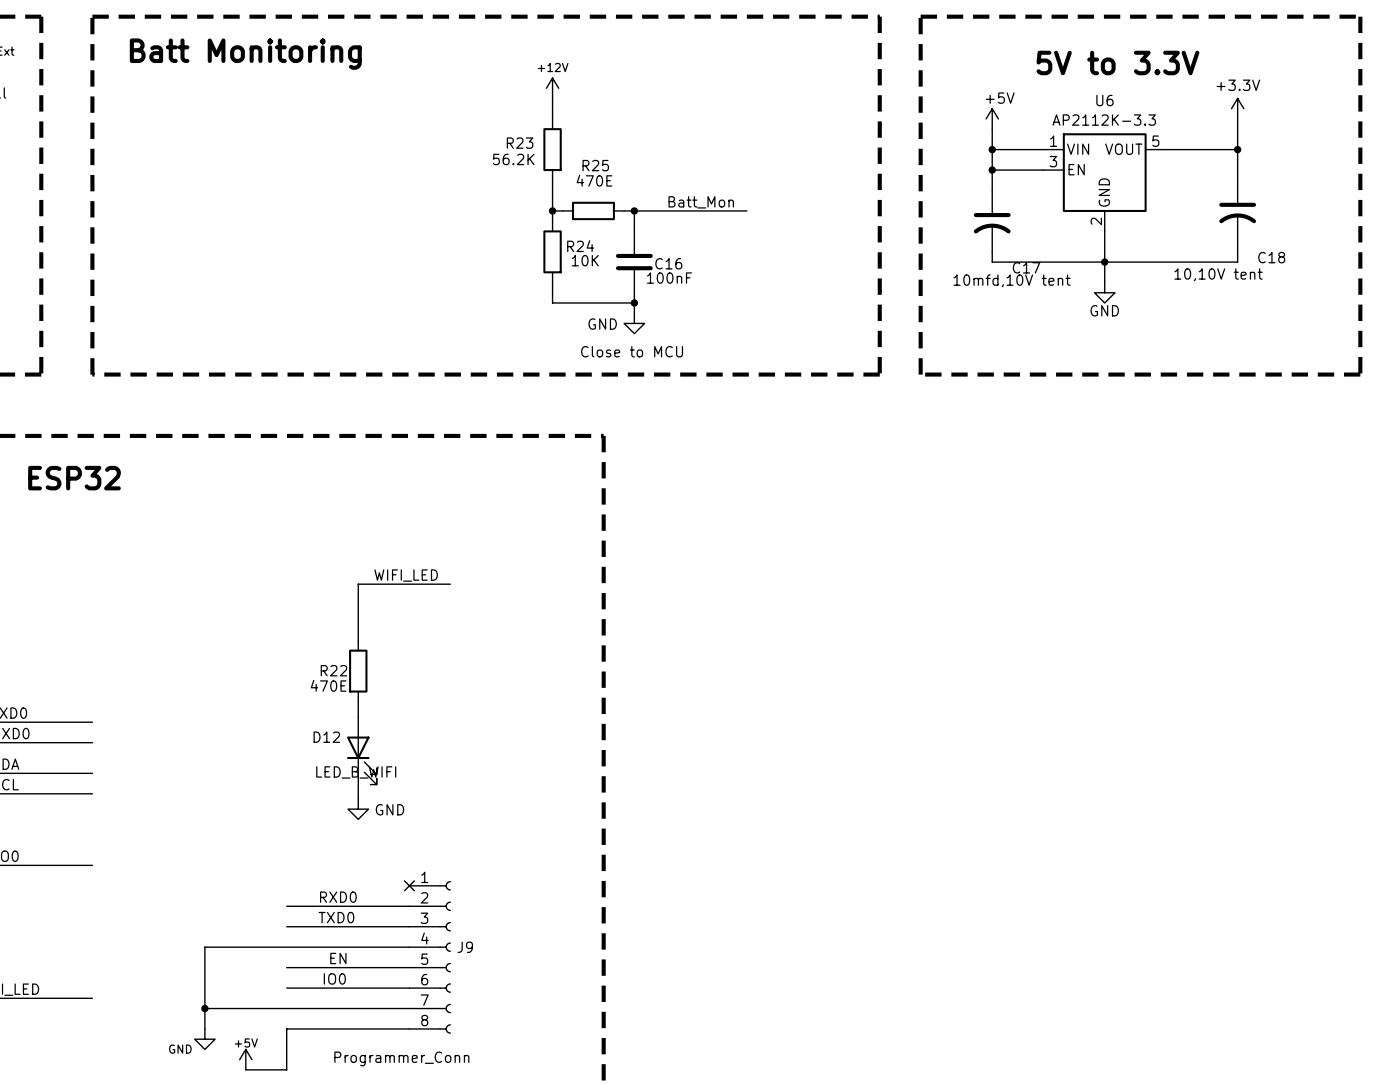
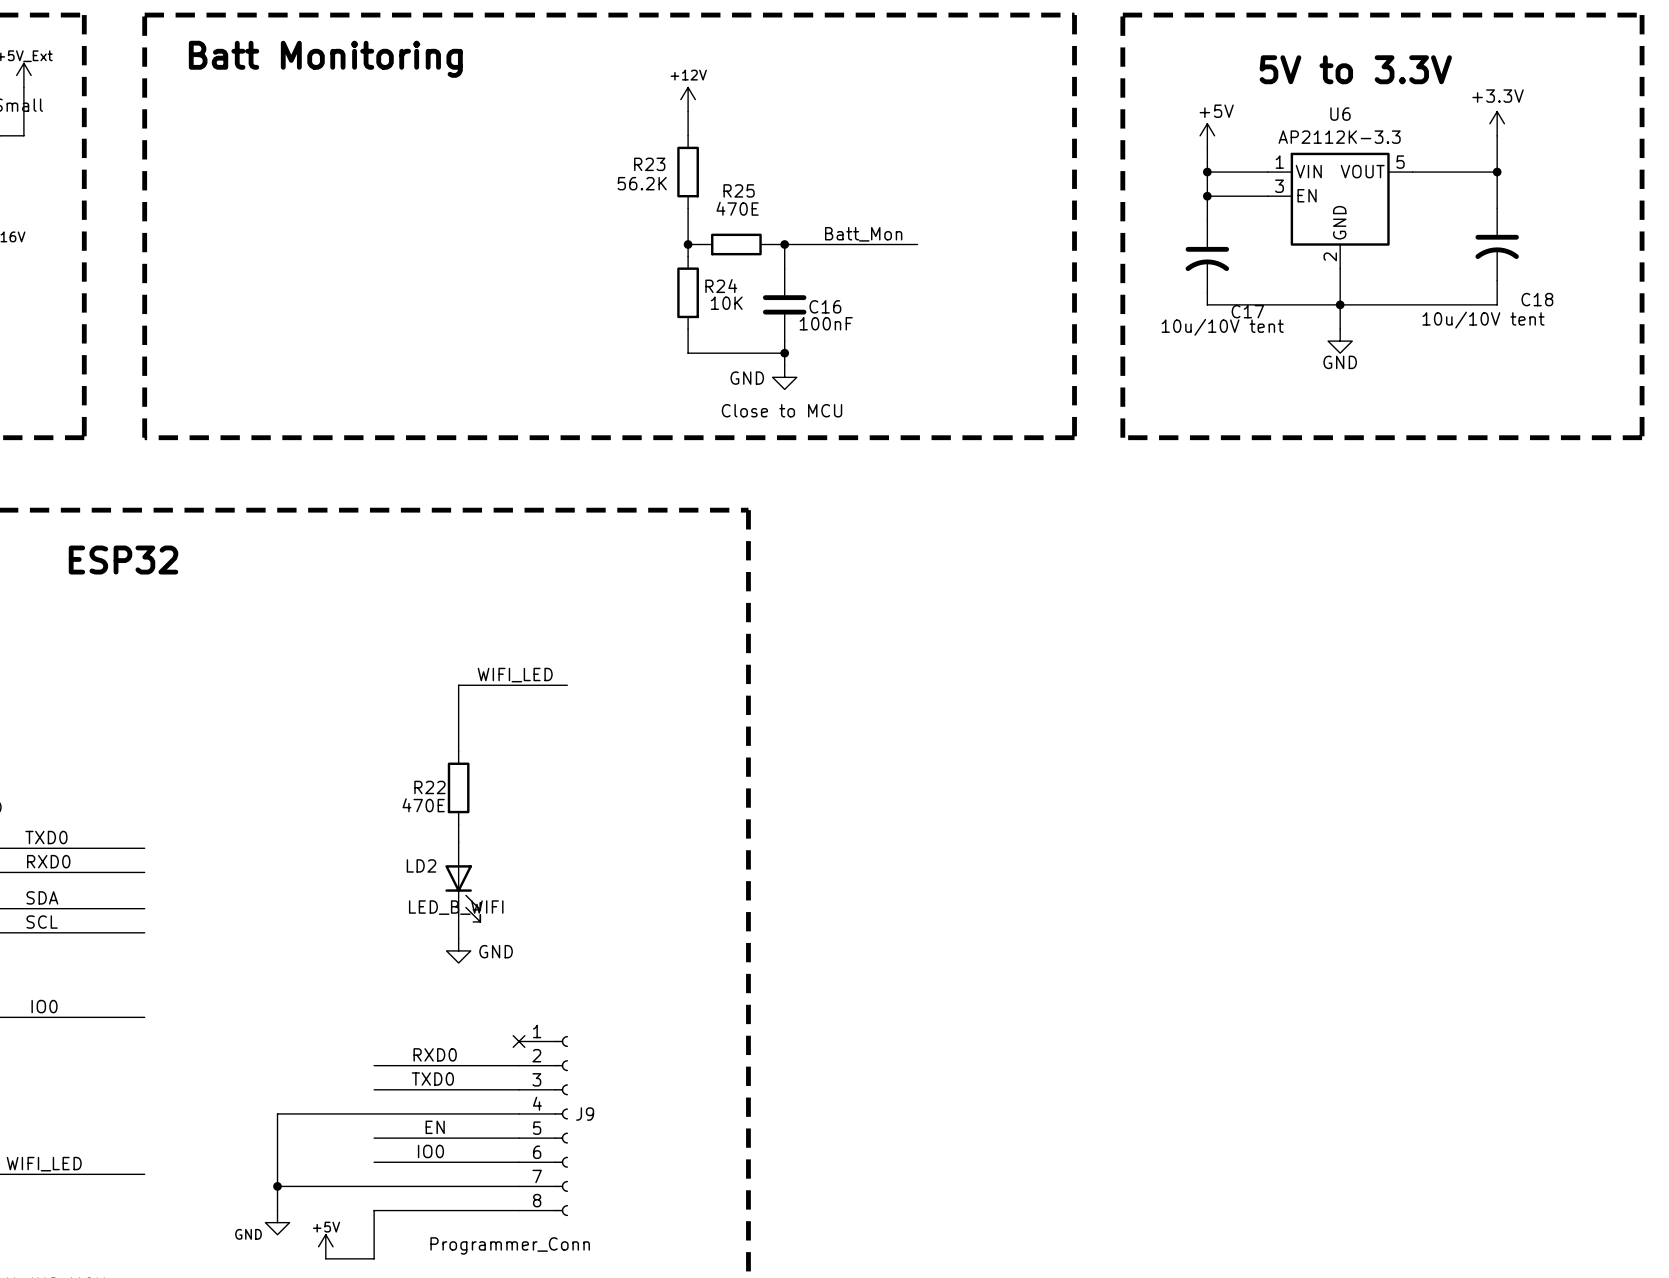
C18 value: 10,10V tent (1218, 274) -> 10u/10V tent (1483, 320)
C17 value: 10mfd,10V tent (1012, 280) -> 10u/10V tent (1222, 327)
D12 name: D12 (326, 737) -> LD2 (421, 865)

